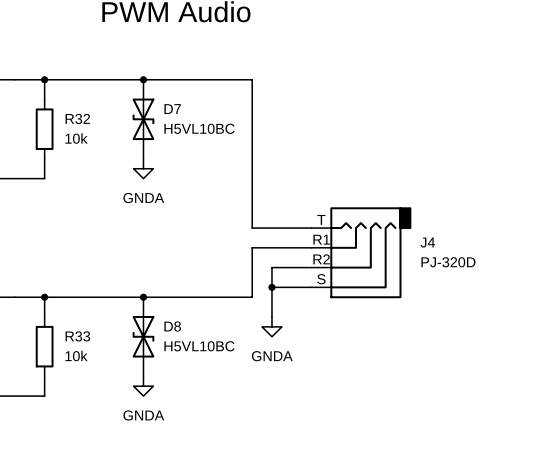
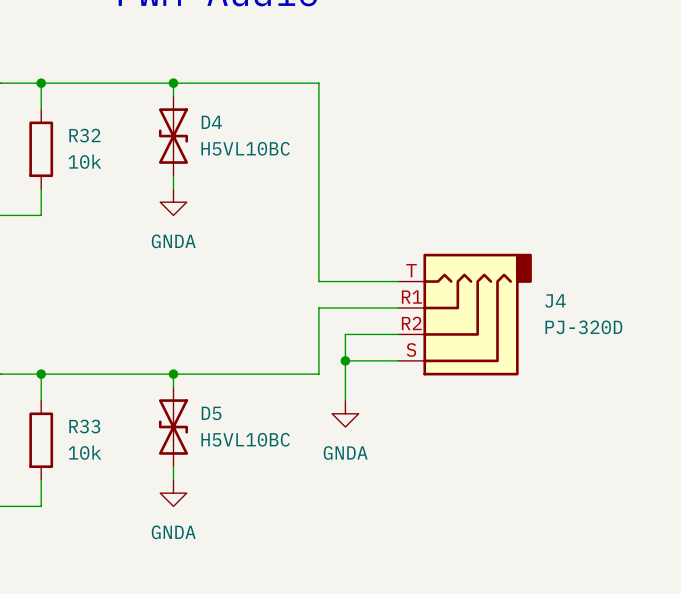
D7 name: D7 (172, 109) -> D4 (211, 122)
D8 name: D8 (172, 326) -> D5 (211, 413)

